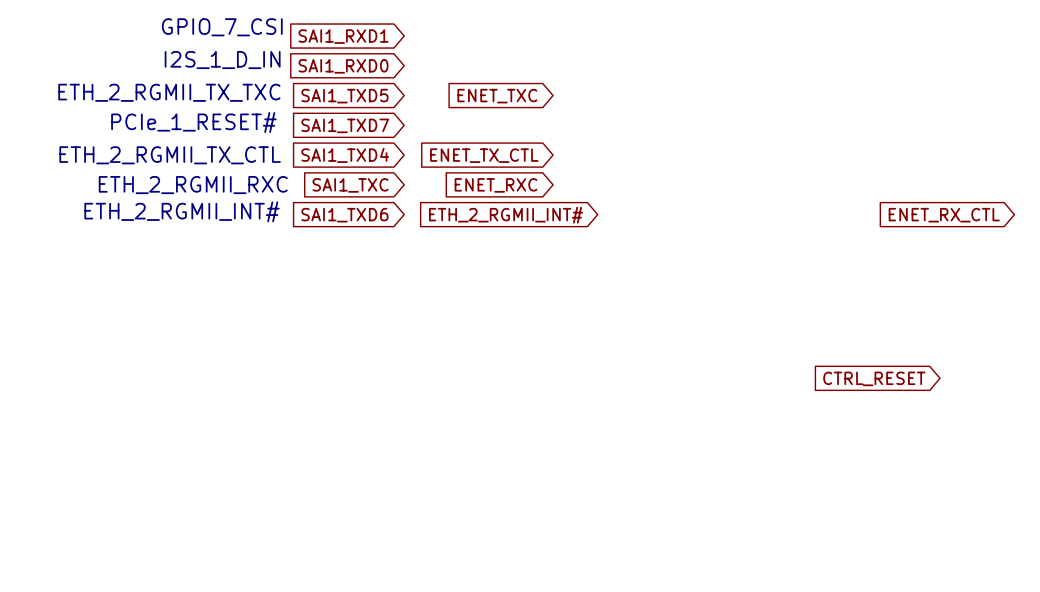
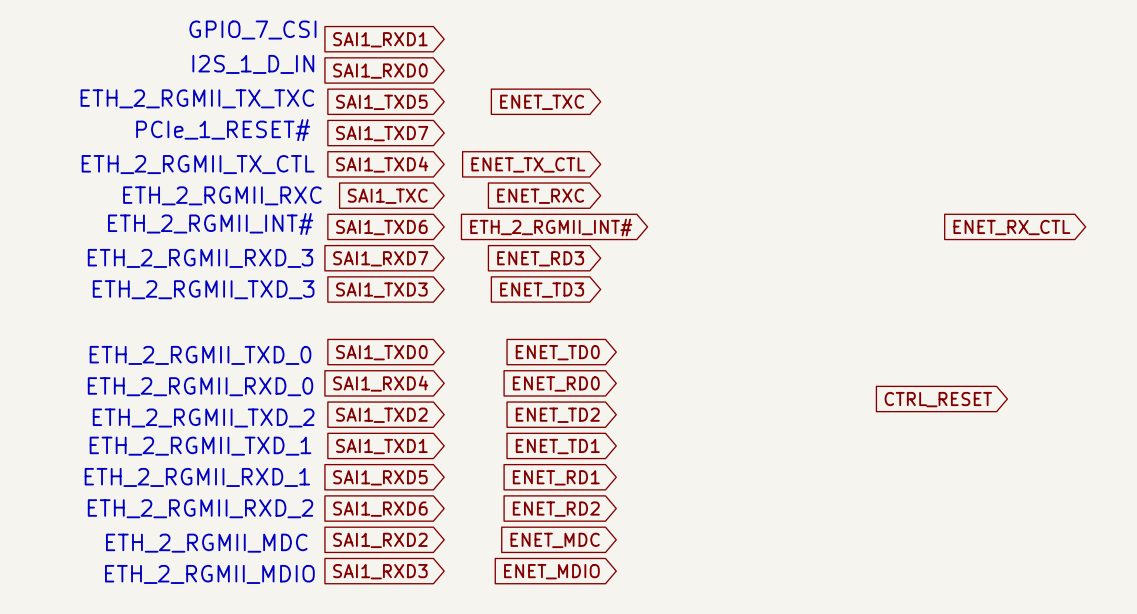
text: none -> ETH_2_RGMII_RXD_3 (200, 258)
global label: none -> SAI1_RXD7 (380, 258)
global label: none -> ENET_RD3 (540, 258)
text: none -> ETH_2_RGMII_TXD_3 (203, 289)
global label: none -> SAI1_TXD3 (381, 290)
global label: none -> ENET_TD3 (542, 290)
global label: none -> SAI1_TXD0 (381, 352)
global label: none -> ENET_TD0 (557, 352)
text: none -> ETH_2_RGMII_TXD_0 (200, 355)
global label: none -> SAI1_RXD4 (380, 383)
global label: none -> ENET_RD0 (556, 383)
text: none -> ETH_2_RGMII_RXD_0 (200, 386)
global label: none -> SAI1_TXD2 (381, 415)
global label: none -> ENET_TD2 (557, 415)
text: none -> ETH_2_RGMII_TXD_2 (203, 418)
text: none -> ETH_2_RGMII_TXD_1 (200, 446)
global label: none -> SAI1_TXD1 (381, 446)
global label: none -> ENET_TD1 (557, 446)
text: none -> ETH_2_RGMII_RXD_1 (197, 477)
global label: none -> SAI1_RXD5 (380, 477)
global label: none -> ENET_RD1 (556, 477)
text: none -> ETH_2_RGMII_RXD_2 (200, 508)
global label: none -> SAI1_RXD6 (380, 509)
global label: none -> ENET_RD2 (556, 509)
global label: none -> SAI1_RXD2 (380, 540)
global label: none -> ENET_MDC (555, 540)
text: none -> ETH_2_RGMII_MDC (206, 543)
global label: none -> SAI1_RXD3 (380, 571)
global label: none -> ENET_MDIO (551, 571)
text: none -> ETH_2_RGMII_MDIO (209, 574)

